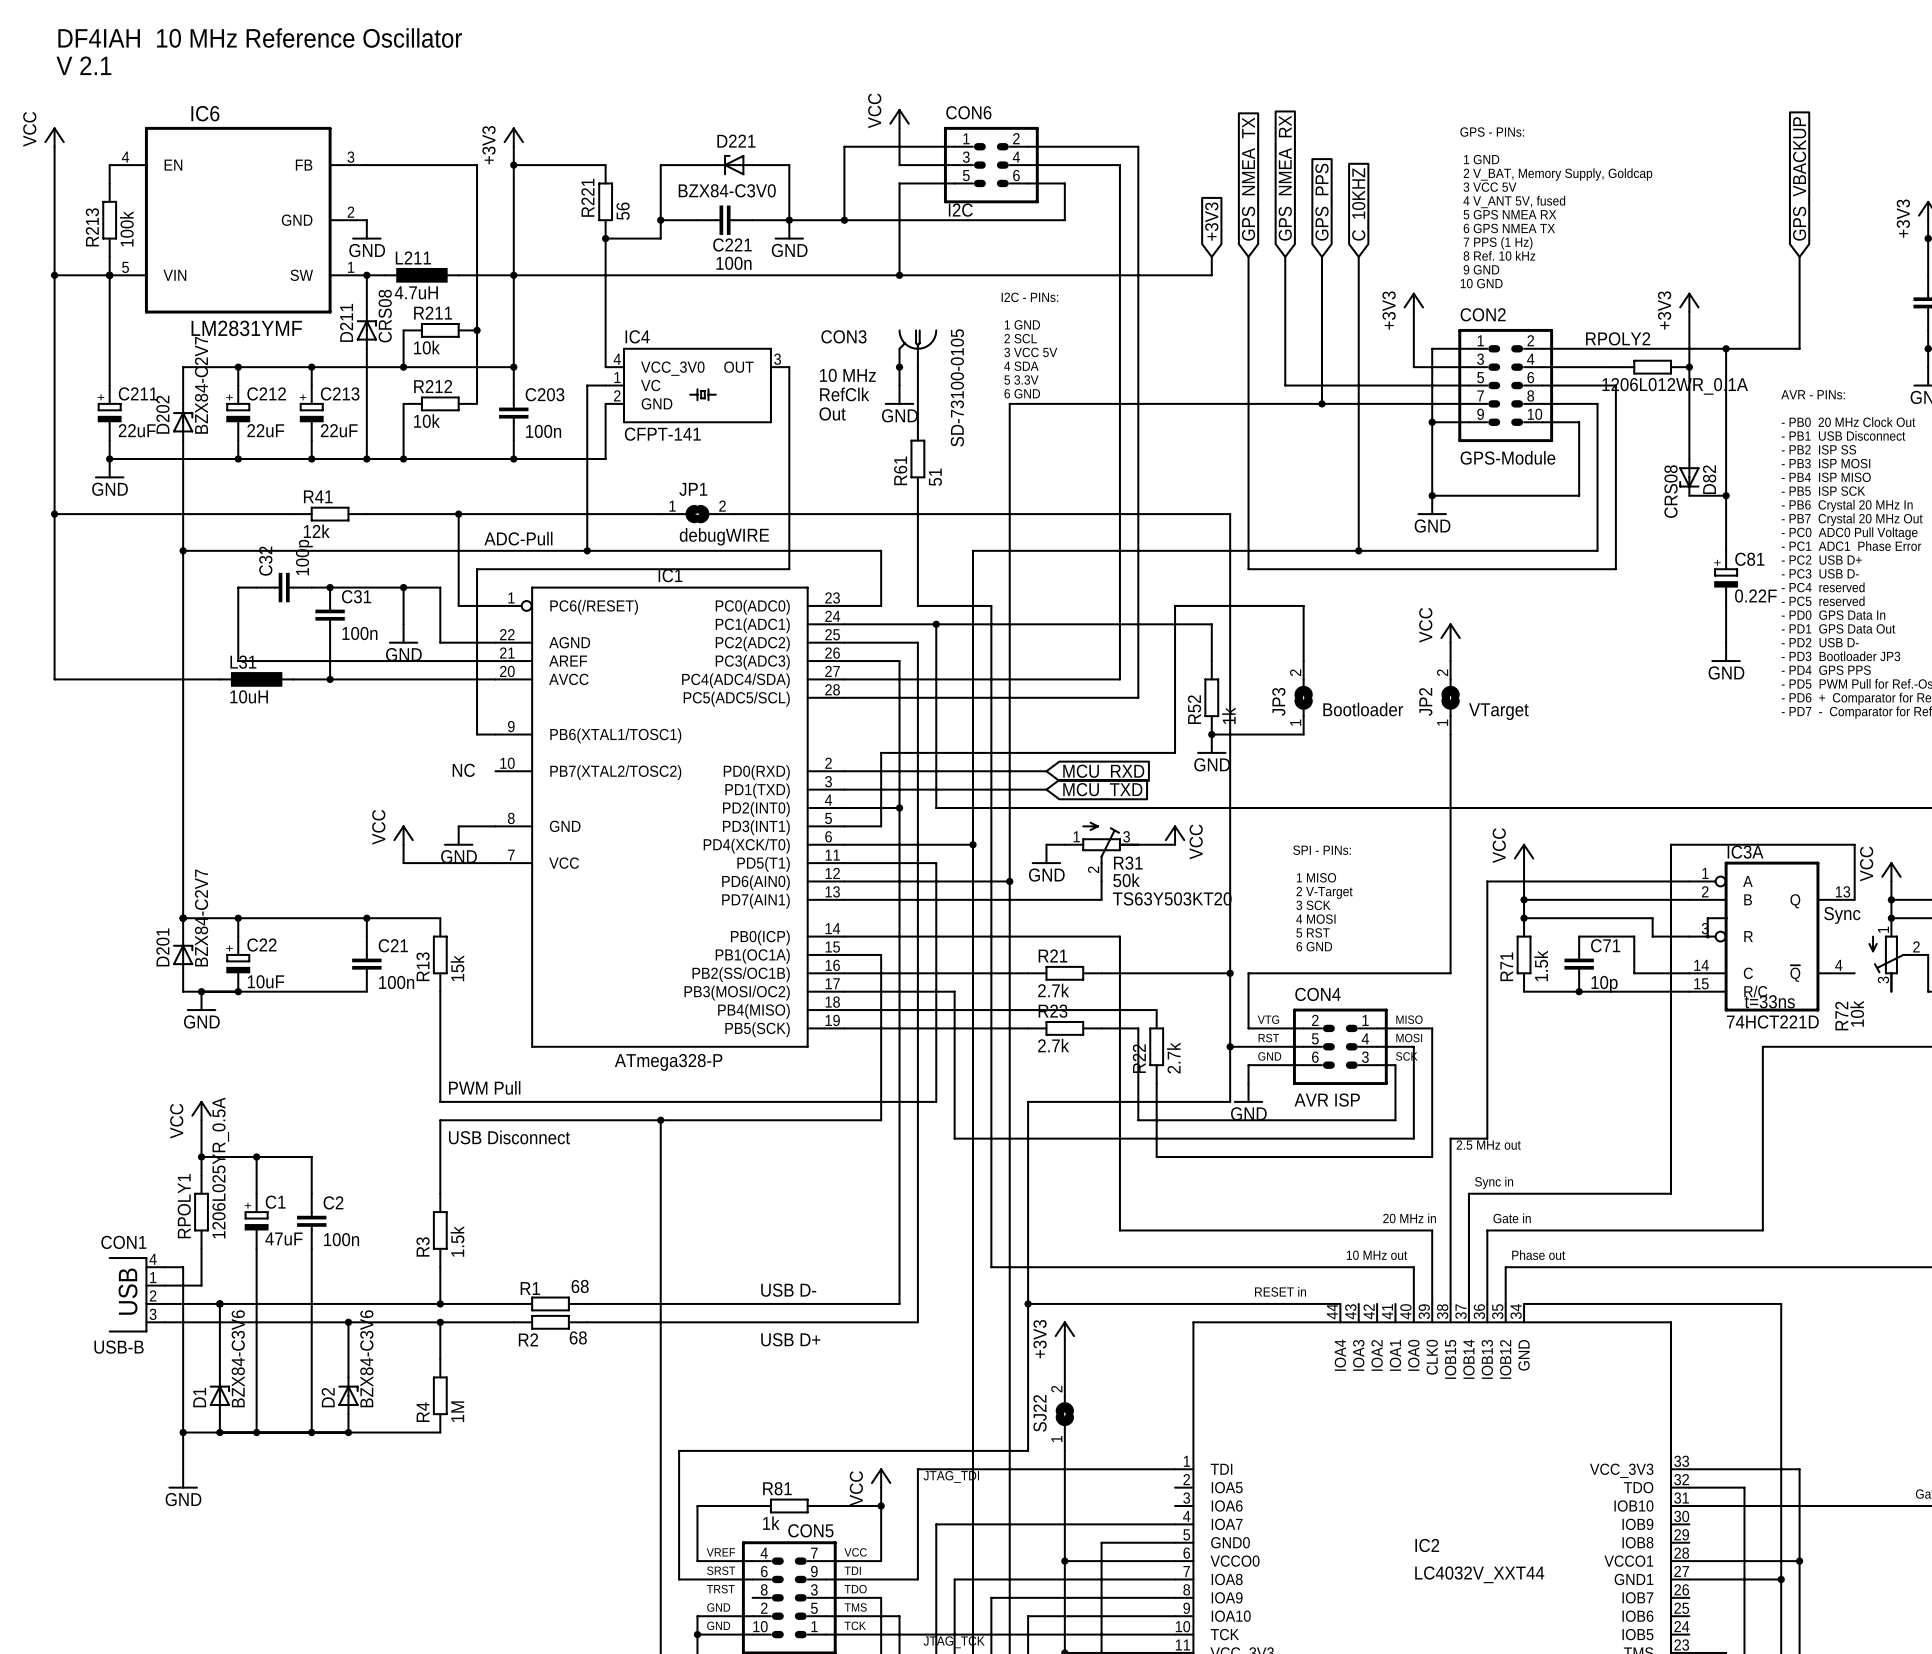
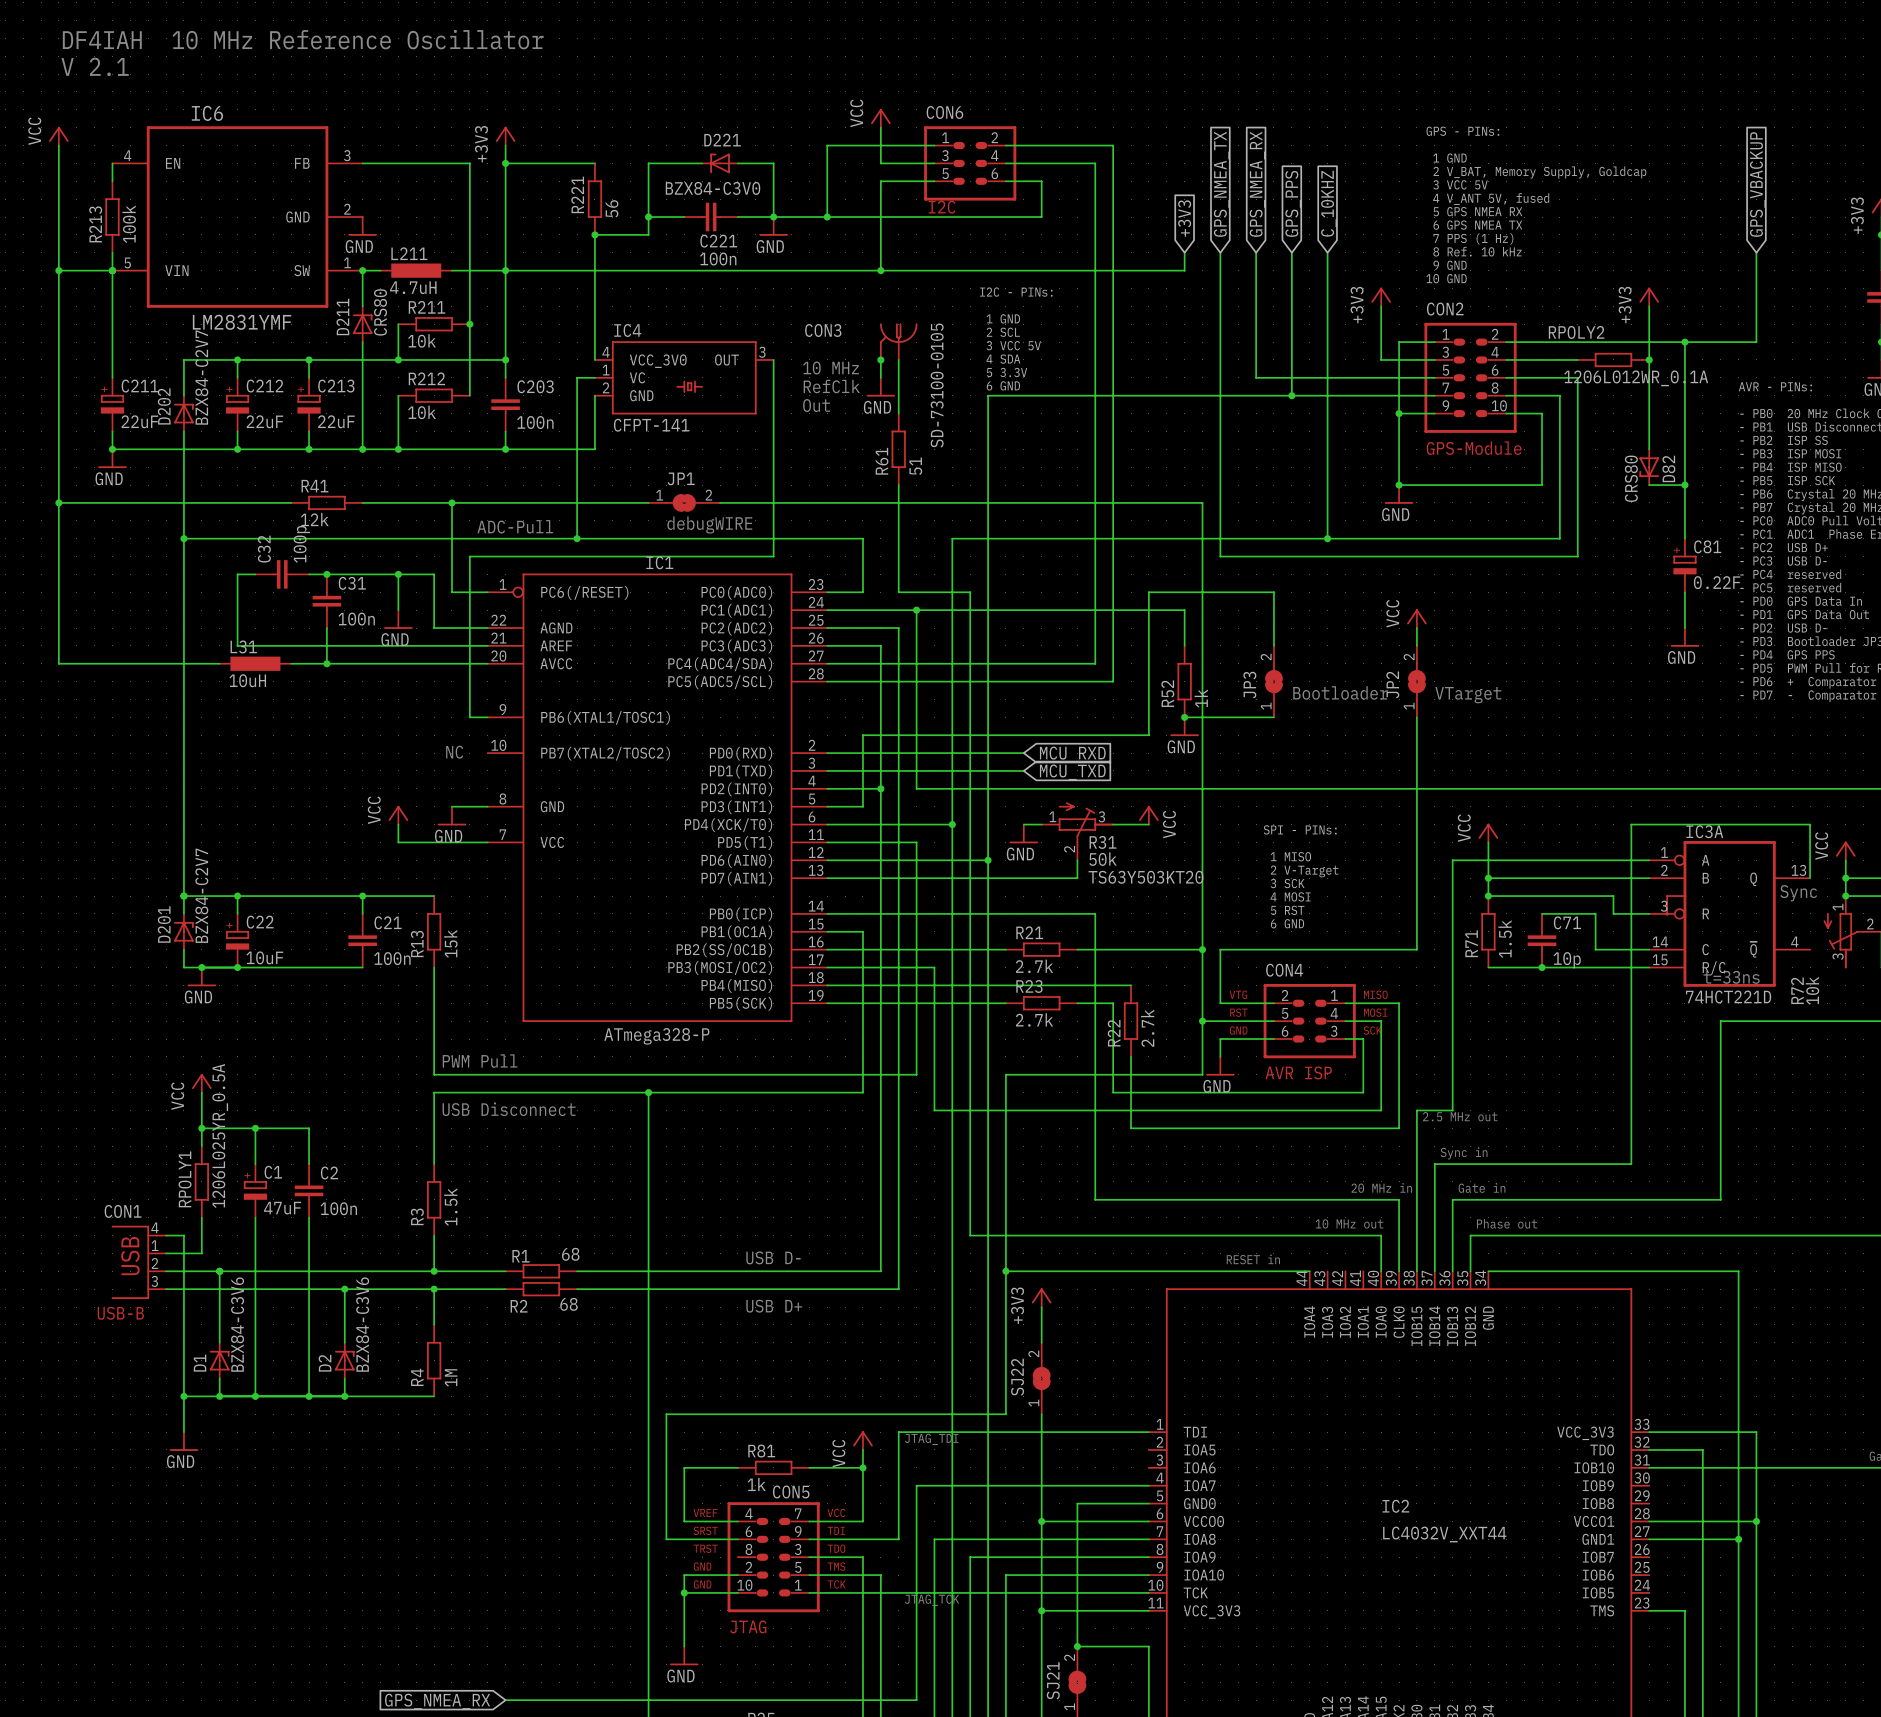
D211 value: CRS08 (385, 316) -> CRS80 (380, 312)
D82 value: CRS08 (1671, 491) -> CRS80 (1631, 478)

